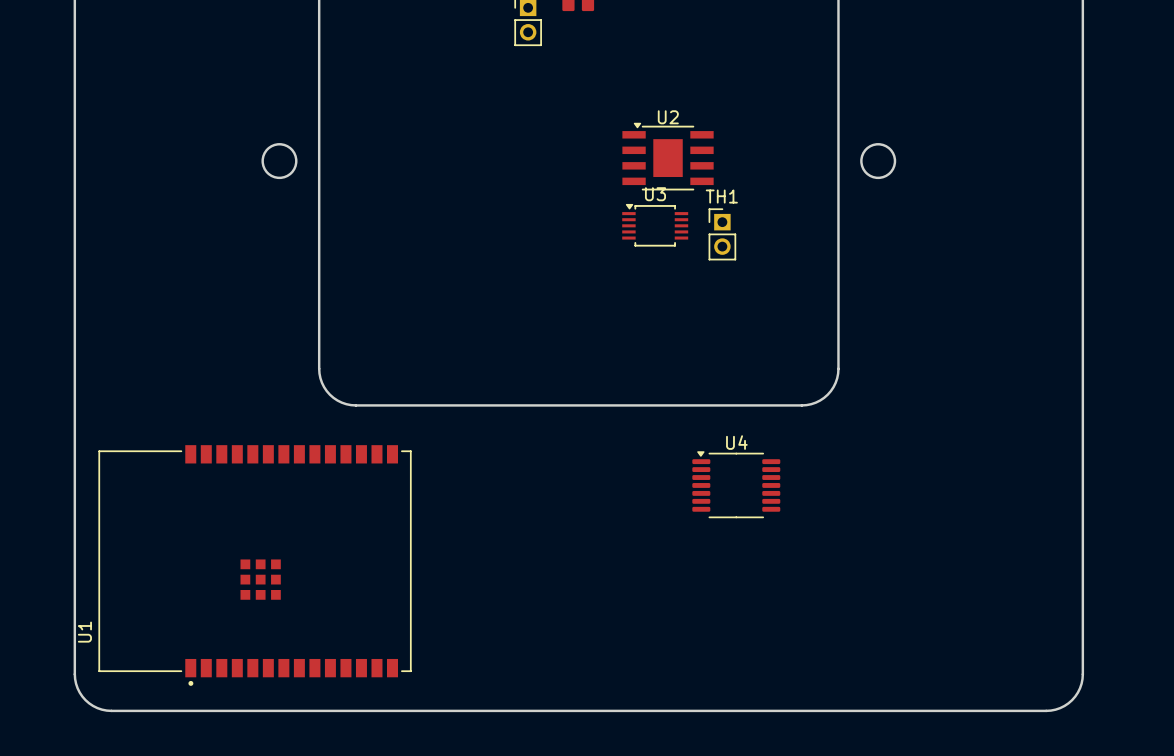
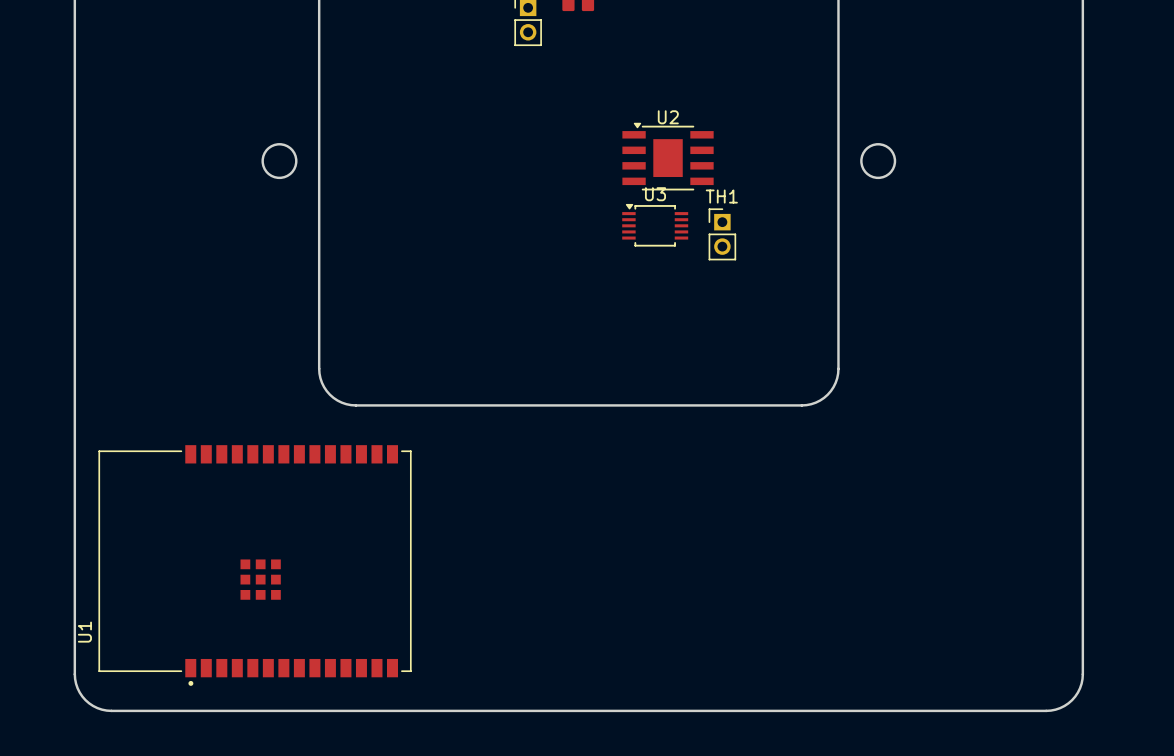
U4: (736, 484) -> none

